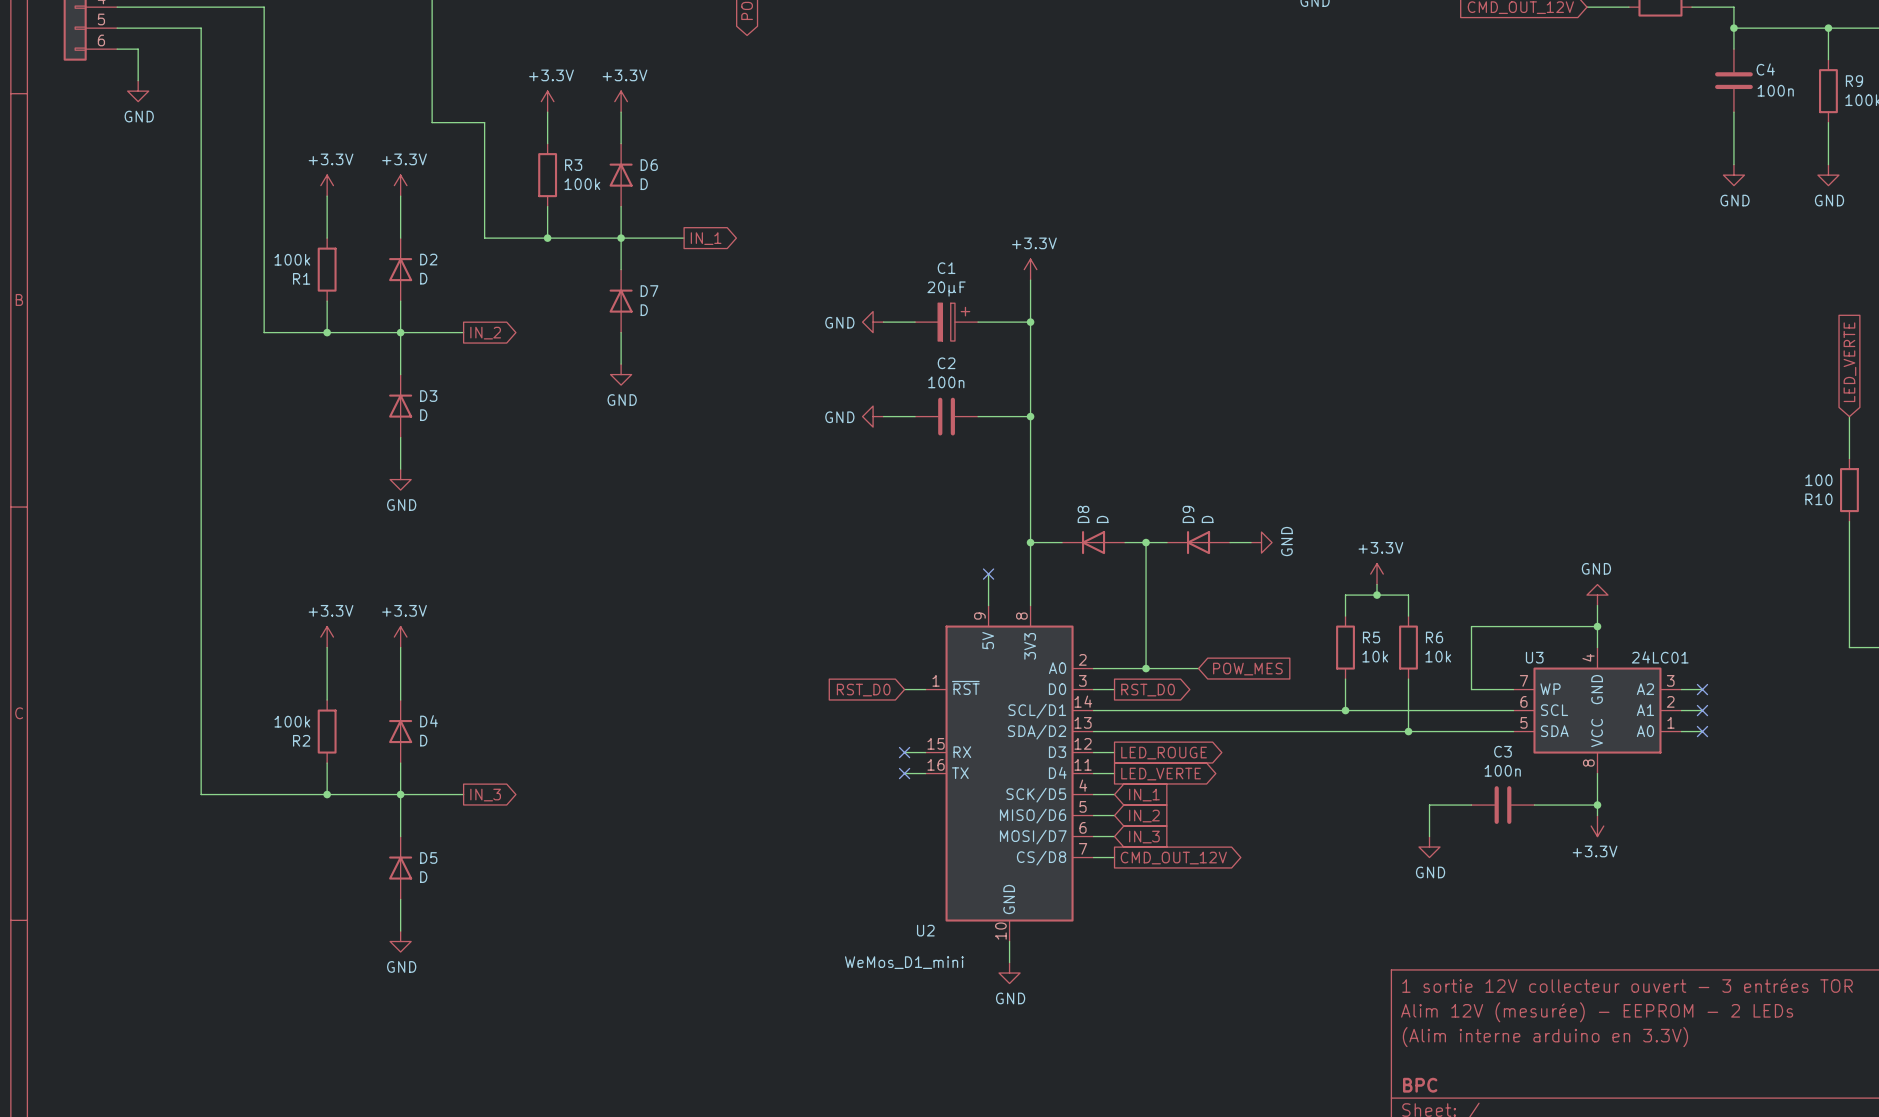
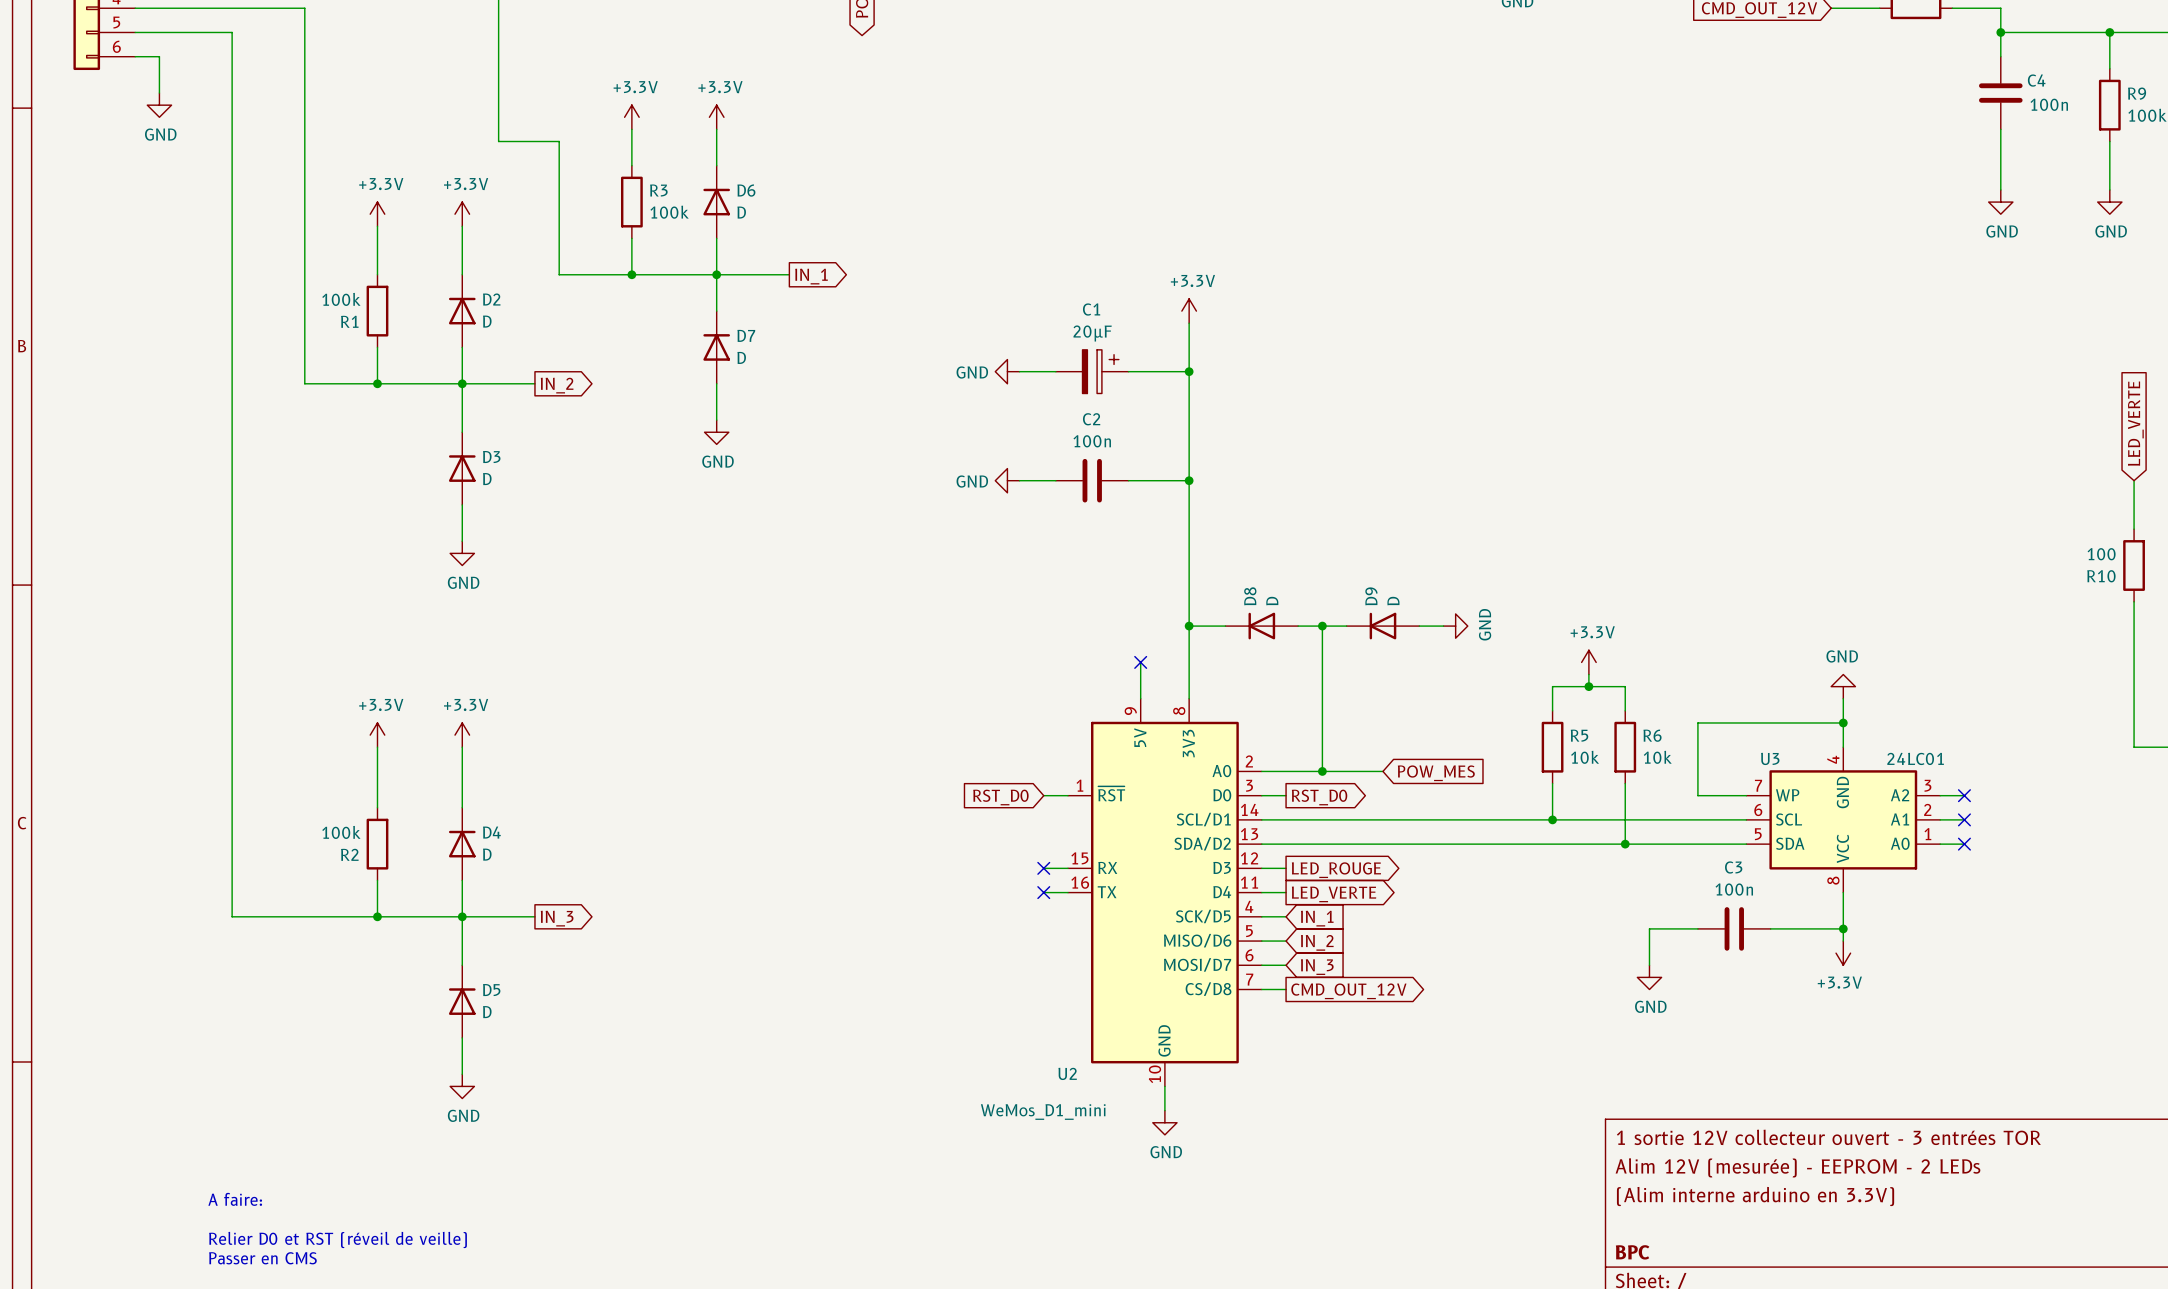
text: none -> A faire: (235, 1199)
text: none -> Relier D0 et RST (réveil de veille) (338, 1239)
text: none -> Passer en CMS (262, 1258)

